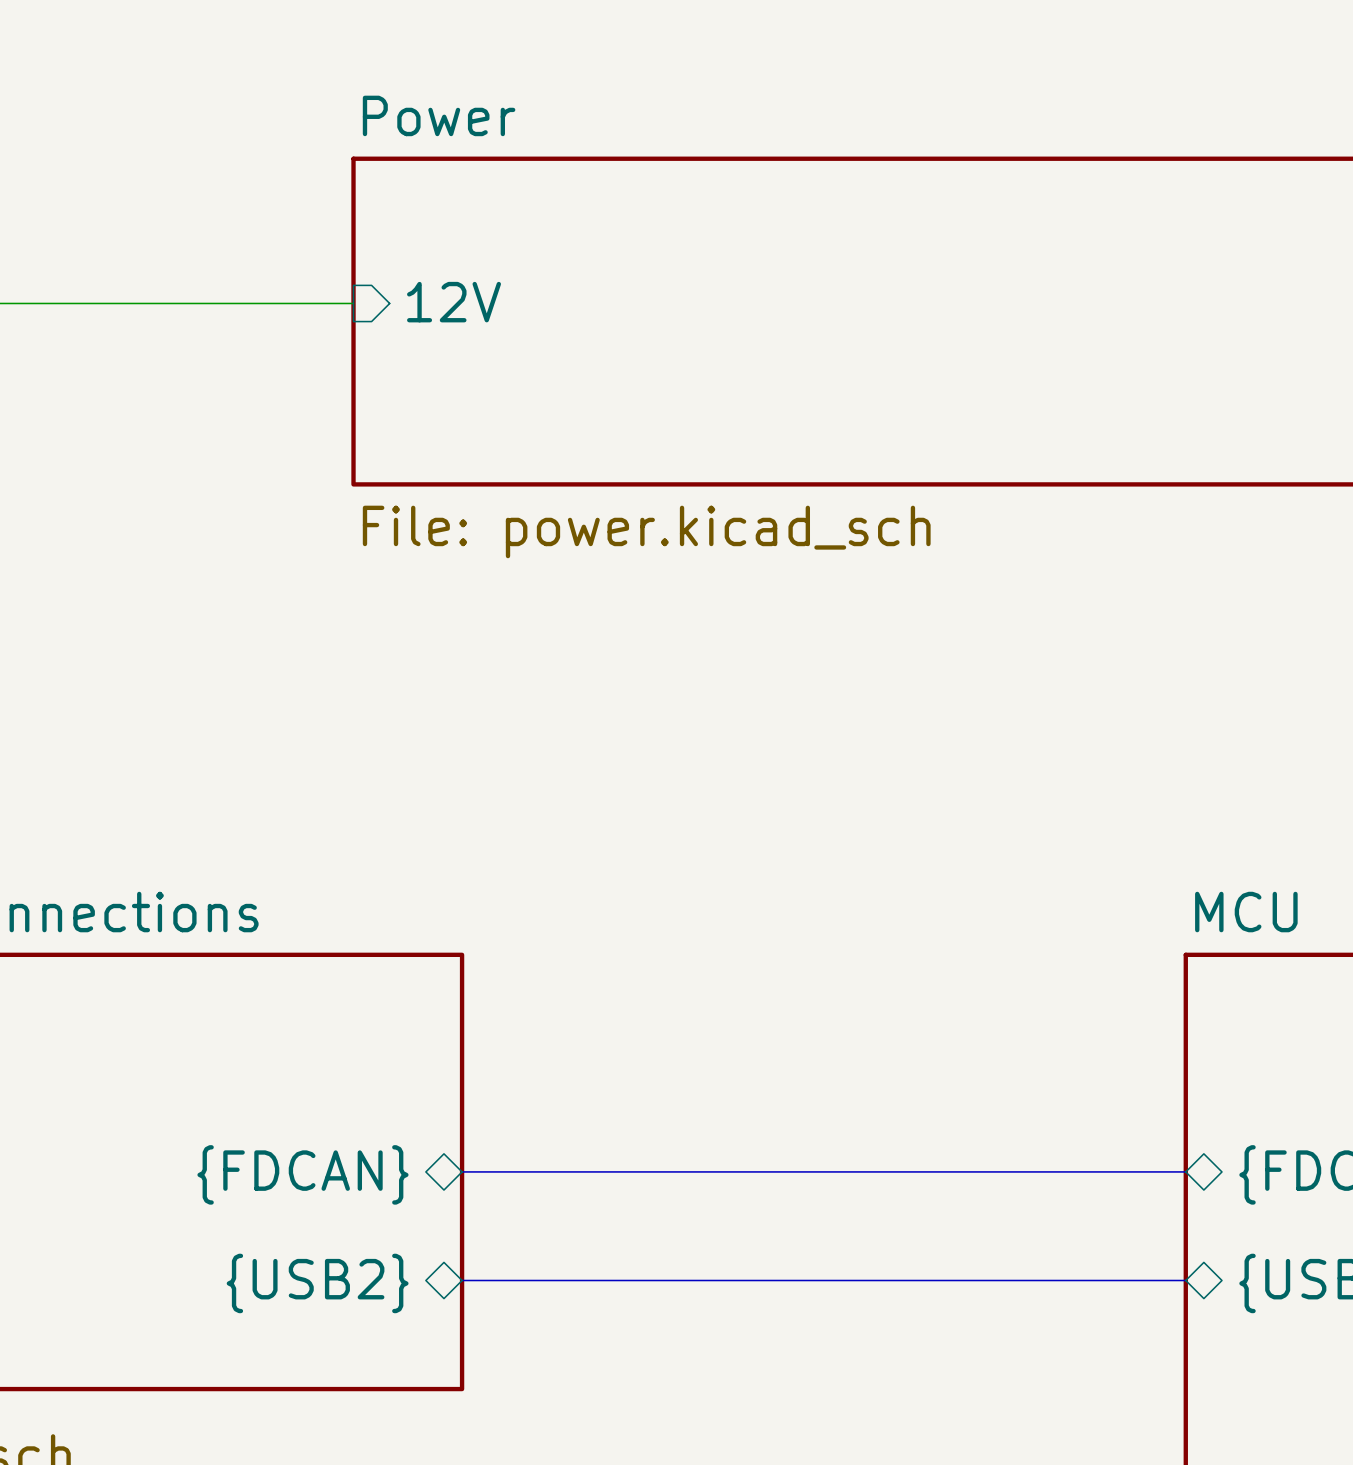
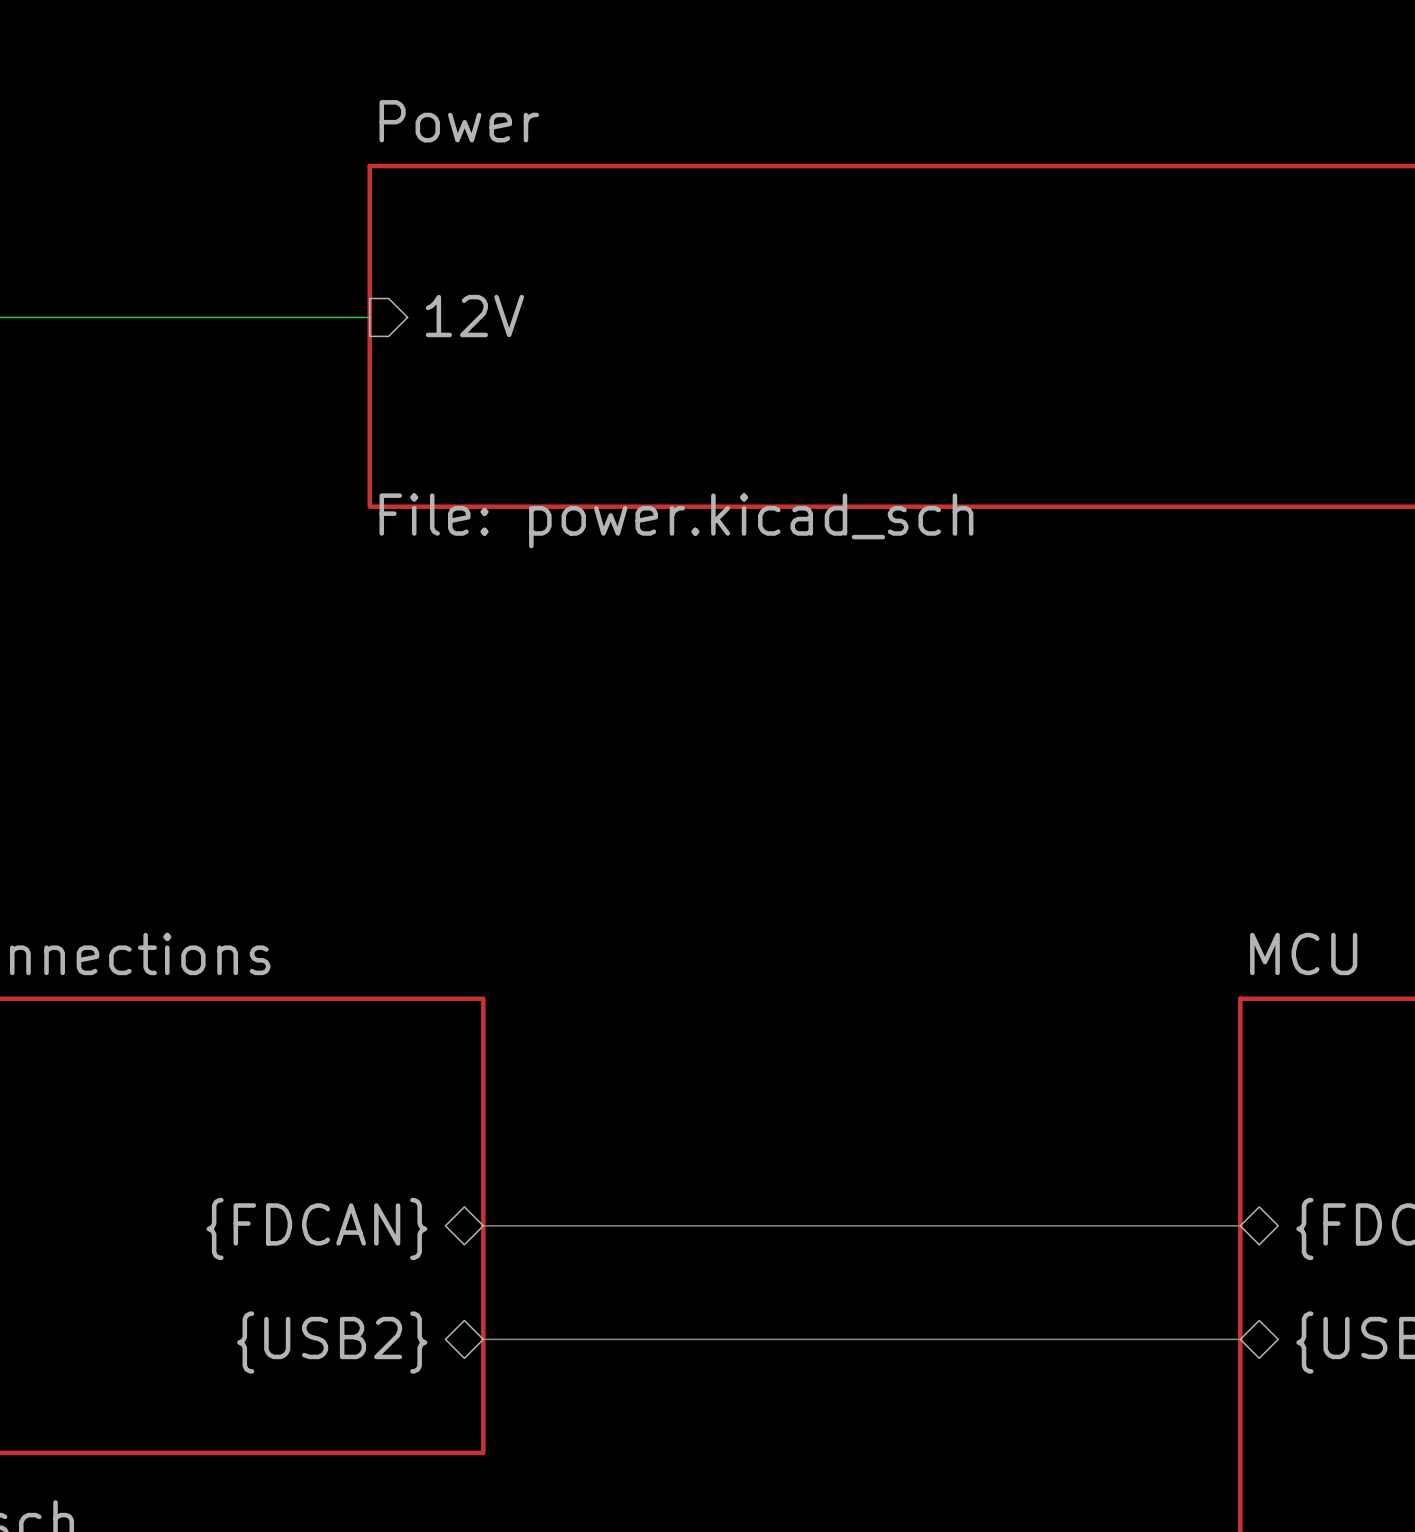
sheet Power value position: File: power.kicad_sch (646, 531) -> File: power.kicad_sch (676, 520)

